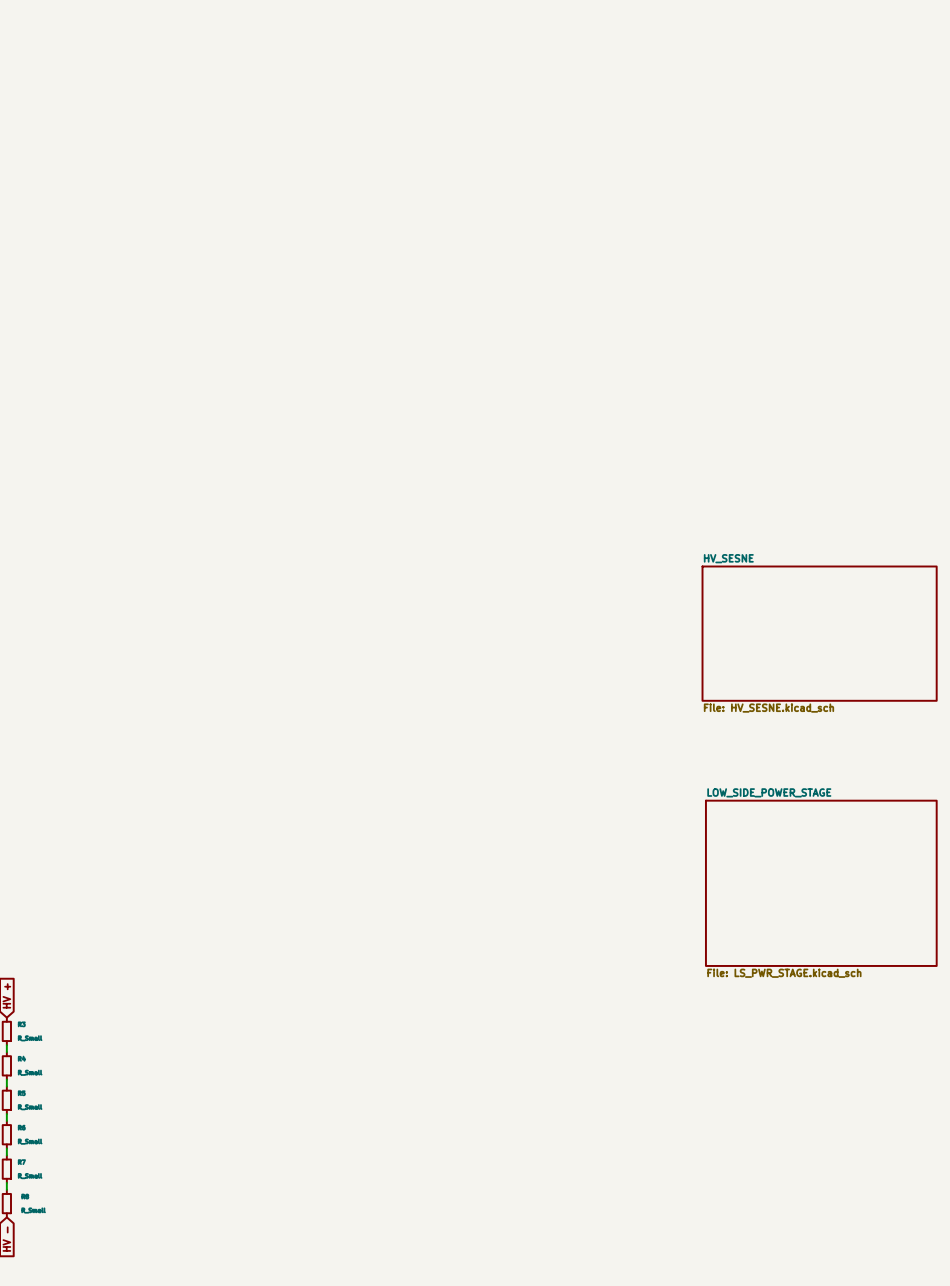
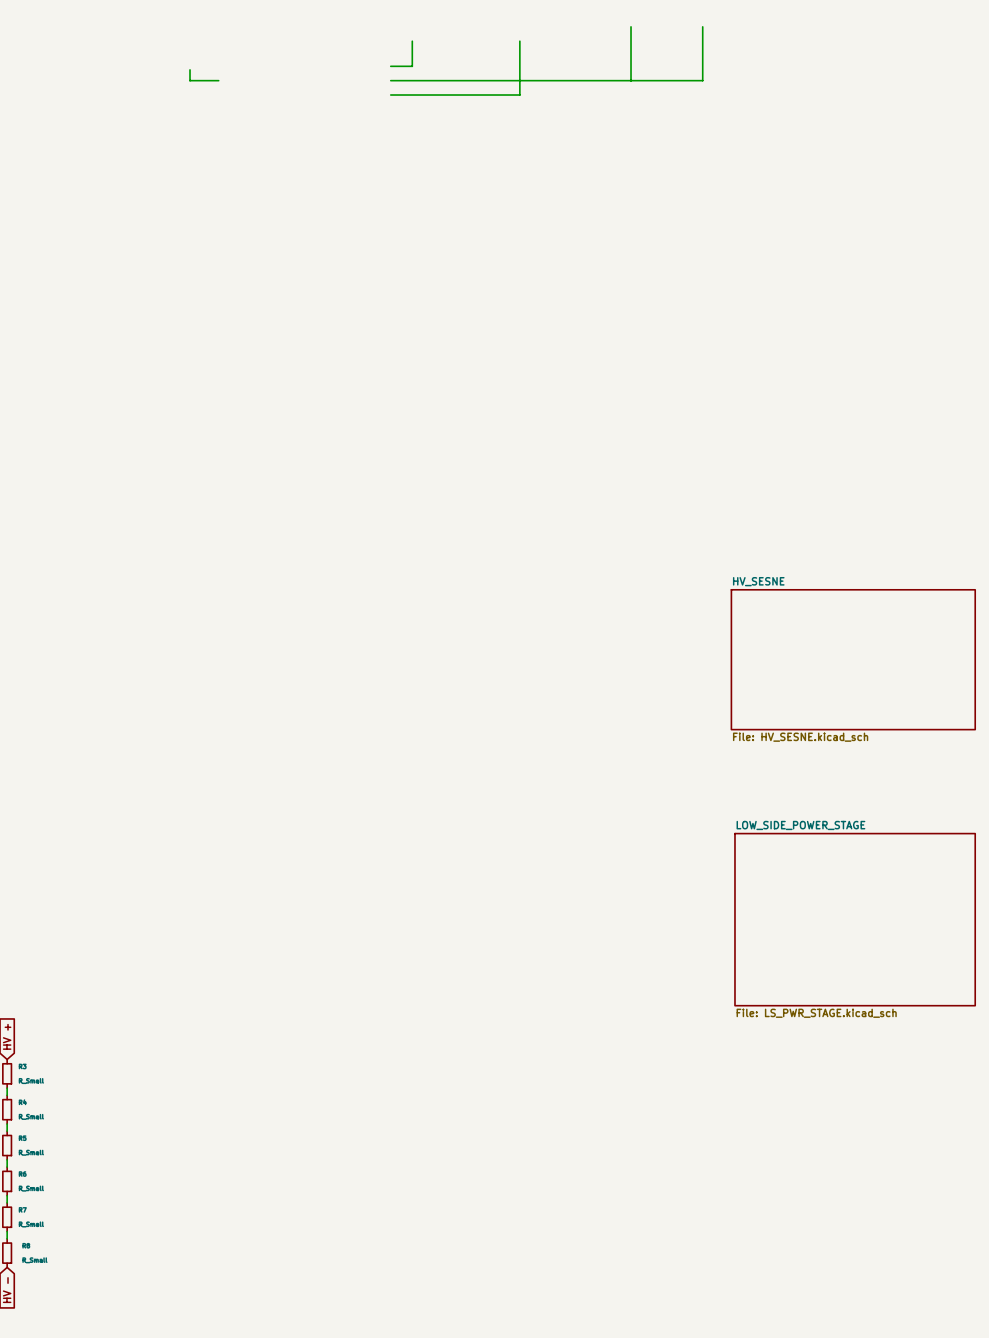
wire: none -> (631, 26) (631, 80)
wire: none -> (702, 26) (702, 80) (390, 80)
wire: none -> (412, 41) (412, 66) (390, 66)
wire: none -> (519, 41) (519, 95) (390, 95)
wire: none -> (190, 69) (190, 80) (218, 80)

